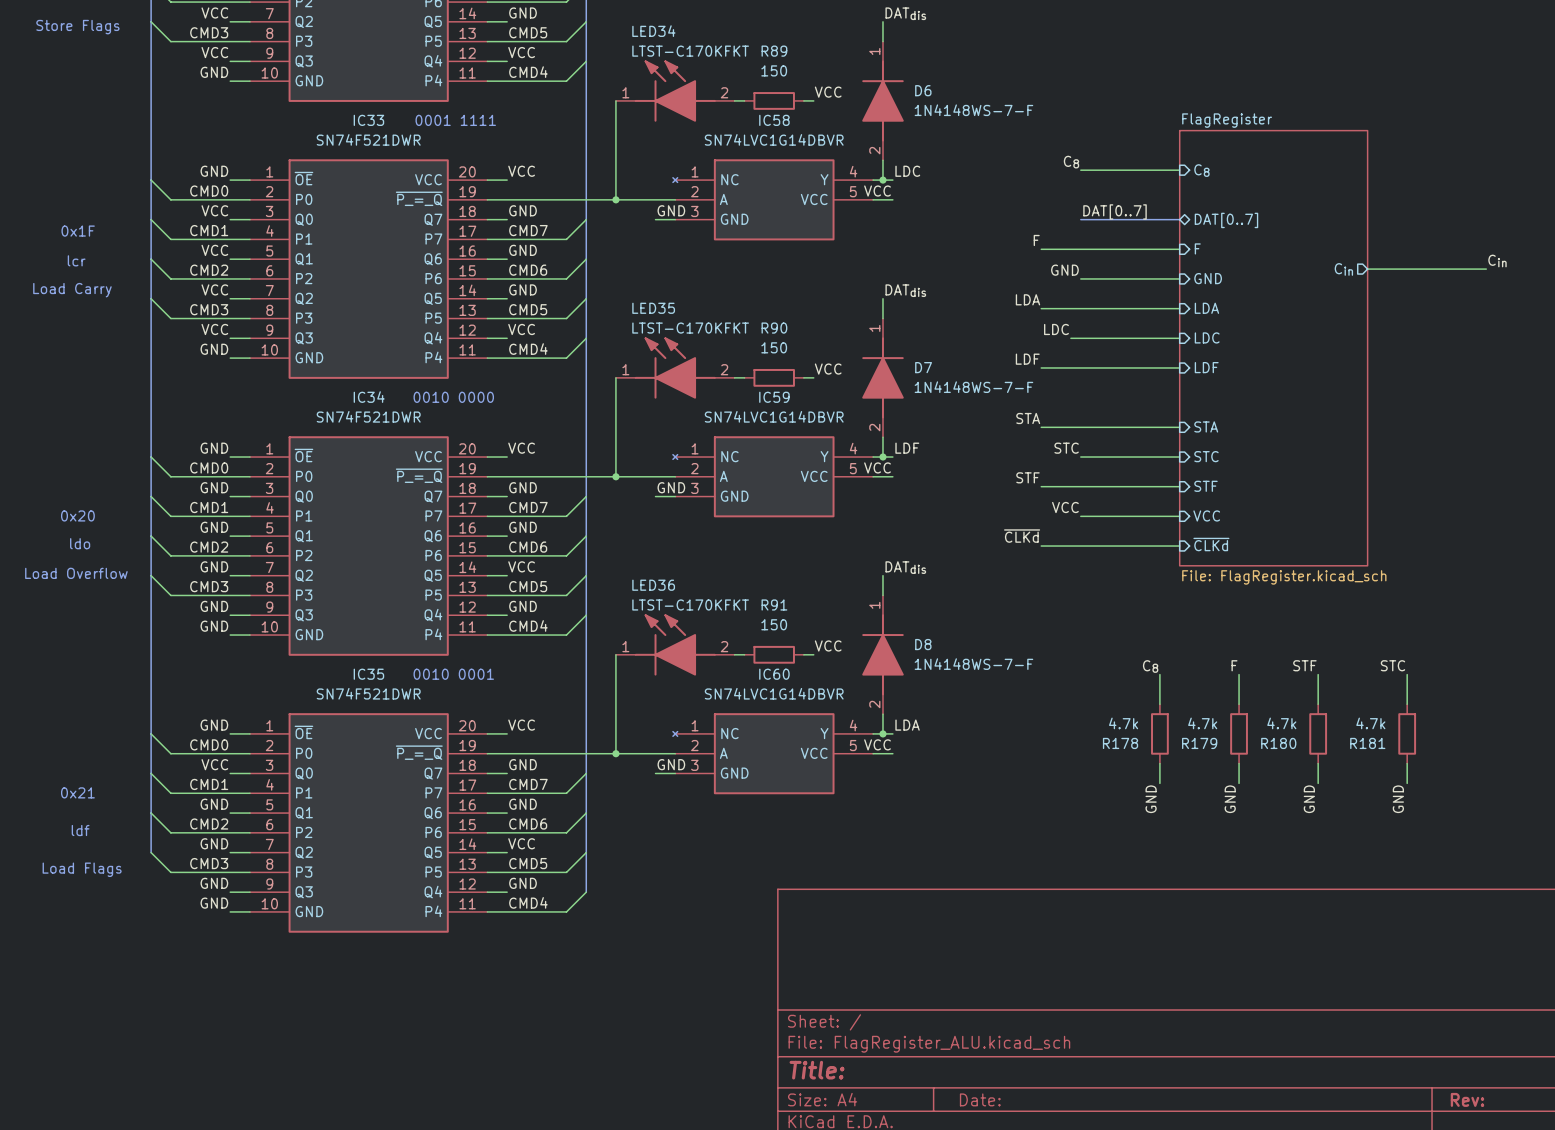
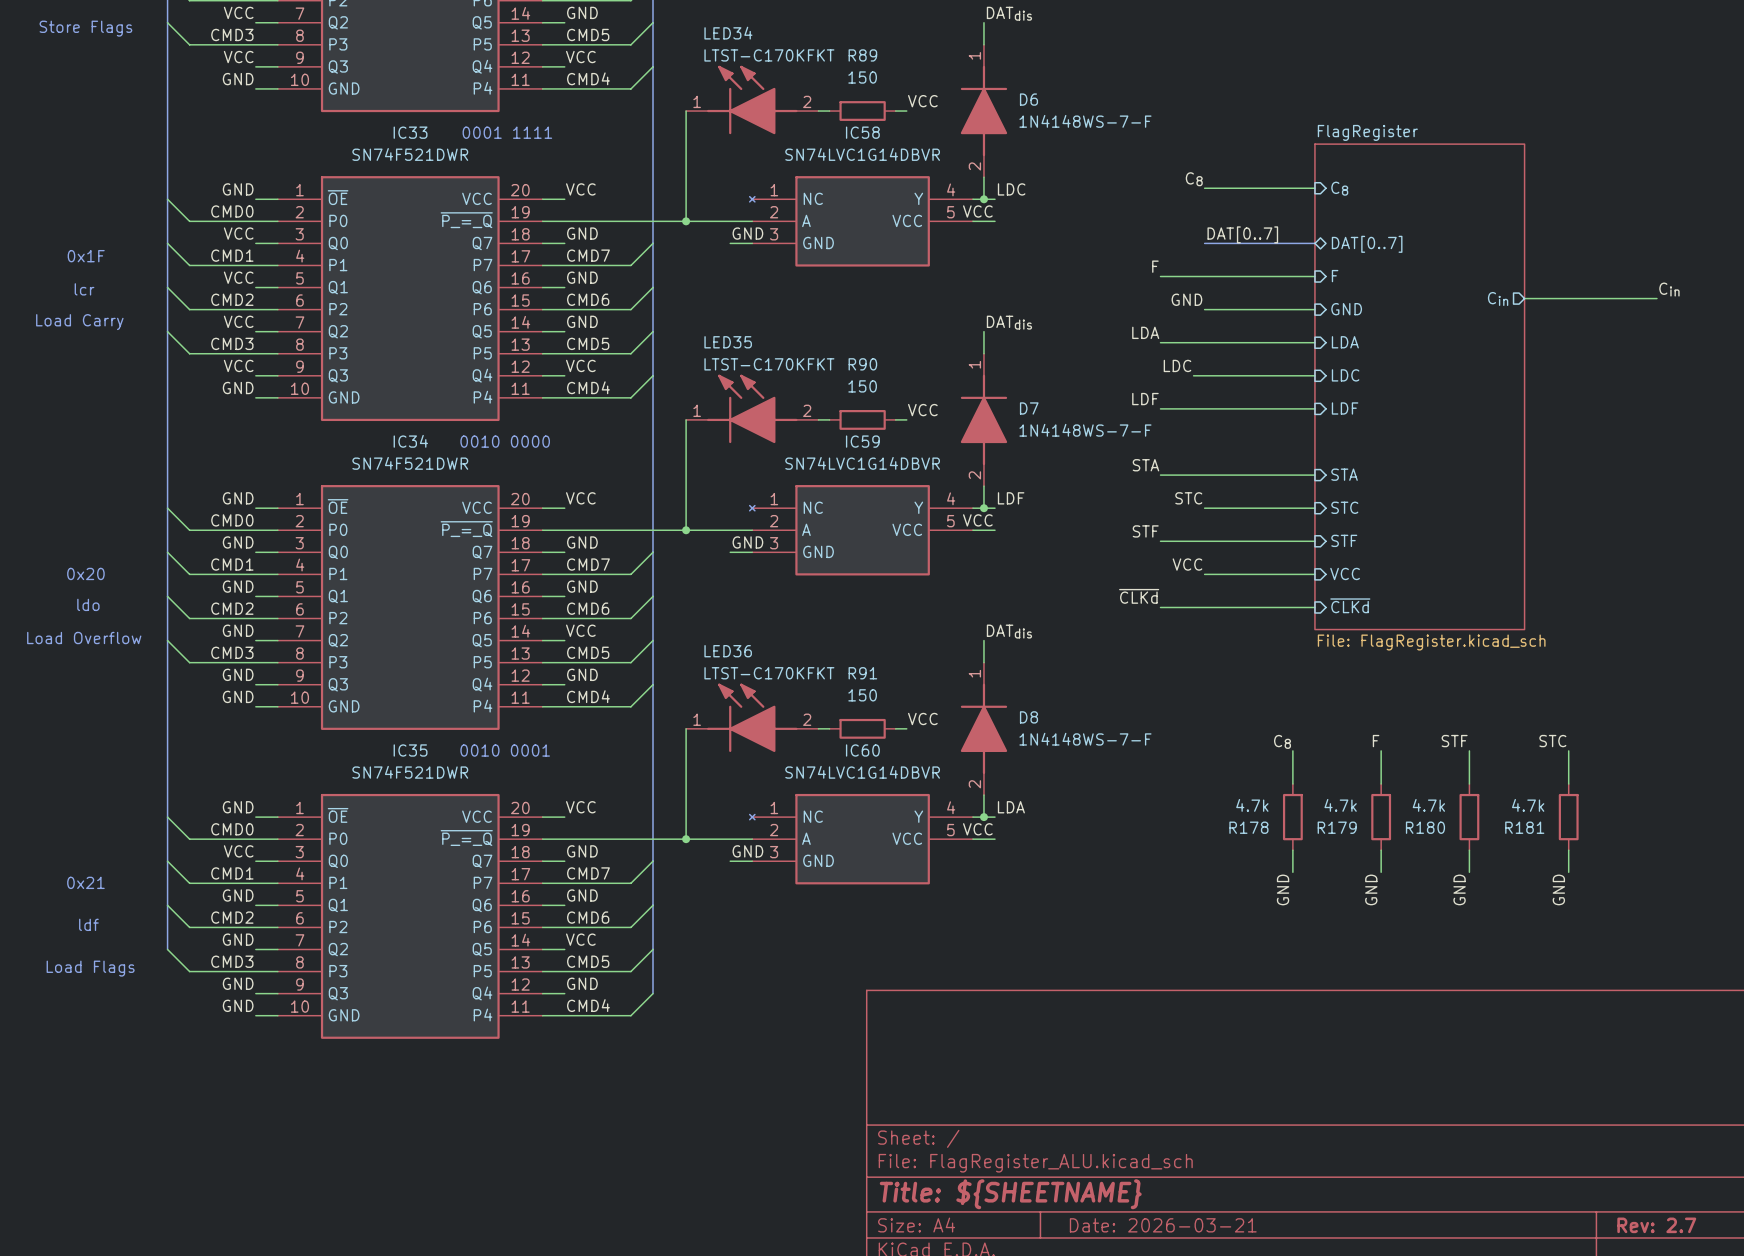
title block: Title: (817, 1070) -> Title: ${SHEETNAME} (1010, 1194)
title block: Date: (980, 1099) -> Date: 2026-03-21 (1163, 1225)
title block: Rev: (1467, 1099) -> Rev: 2.7 (1656, 1225)

